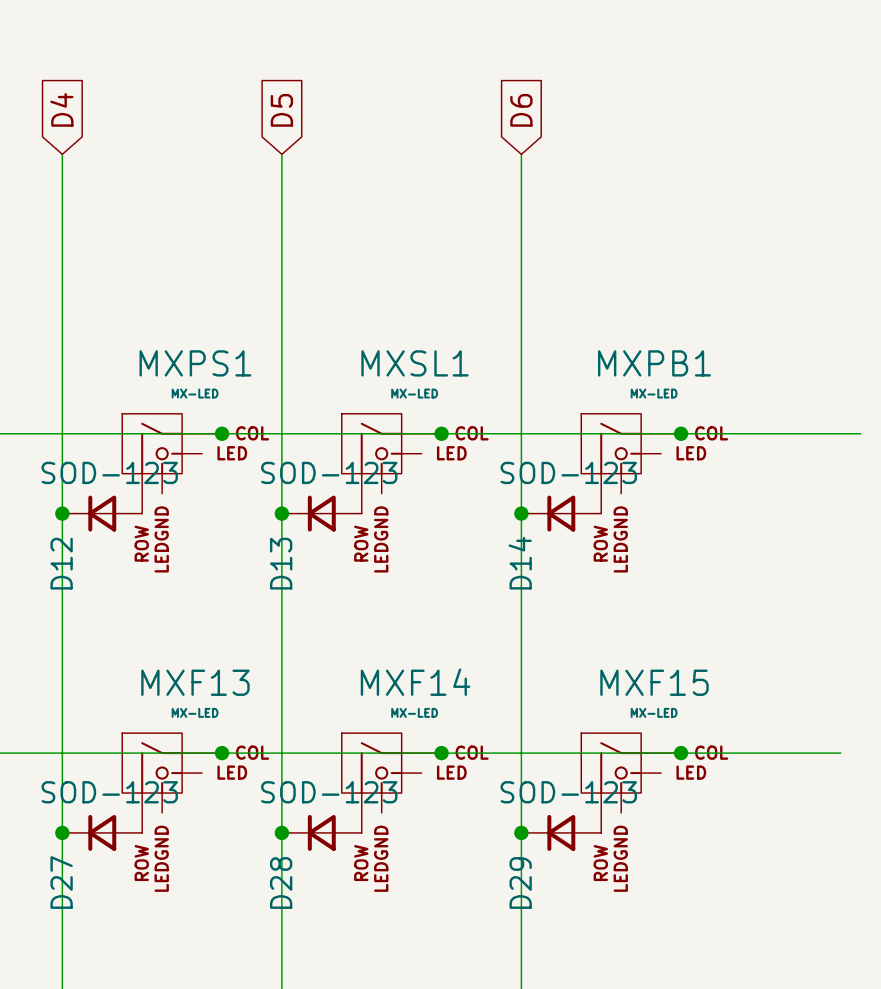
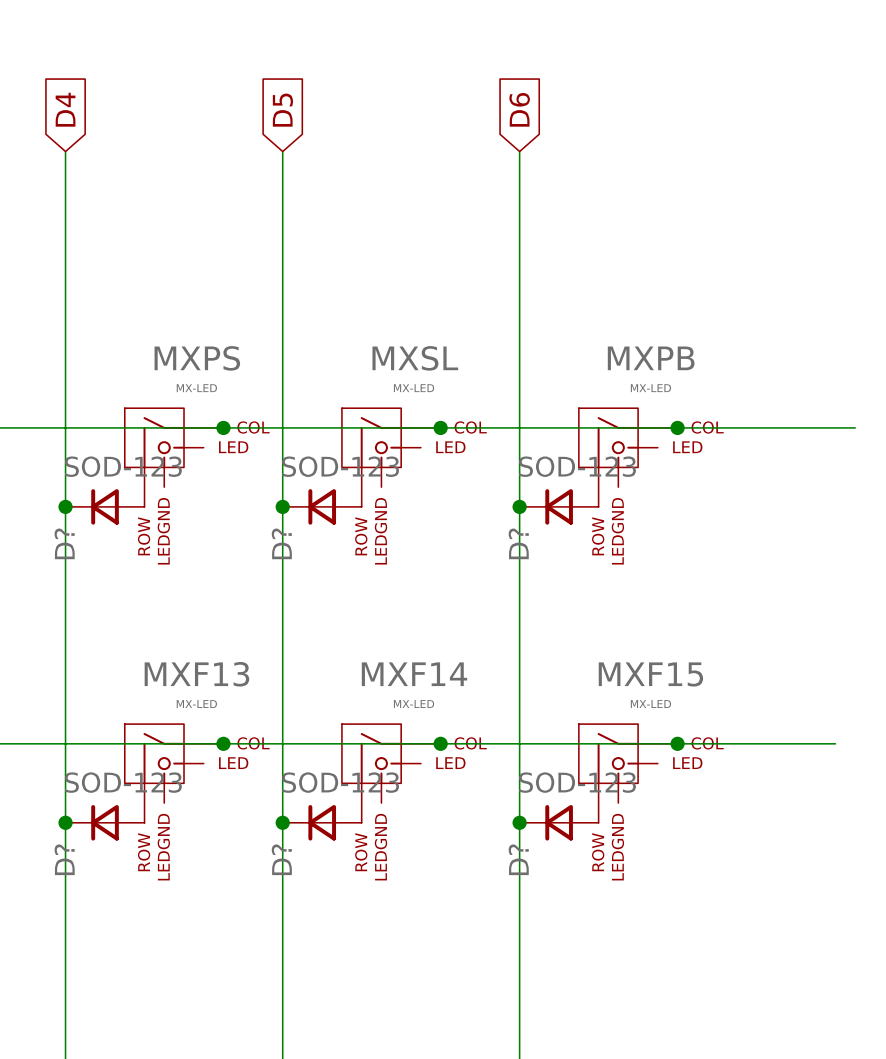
MXPS1 name: MXPS1 (195, 363) -> MXPS (197, 358)
MXSL1 name: MXSL1 (414, 363) -> MXSL (415, 358)
MXPB1 name: MXPB1 (654, 363) -> MXPB (651, 358)
D12 name: D12 (61, 563) -> D? (64, 543)
D13 name: D13 (281, 563) -> D? (281, 543)
D14 name: D14 (520, 563) -> D? (518, 543)
D27 name: D27 (61, 882) -> D? (64, 859)
D28 name: D28 (281, 882) -> D? (281, 859)
D29 name: D29 (520, 882) -> D? (518, 859)

